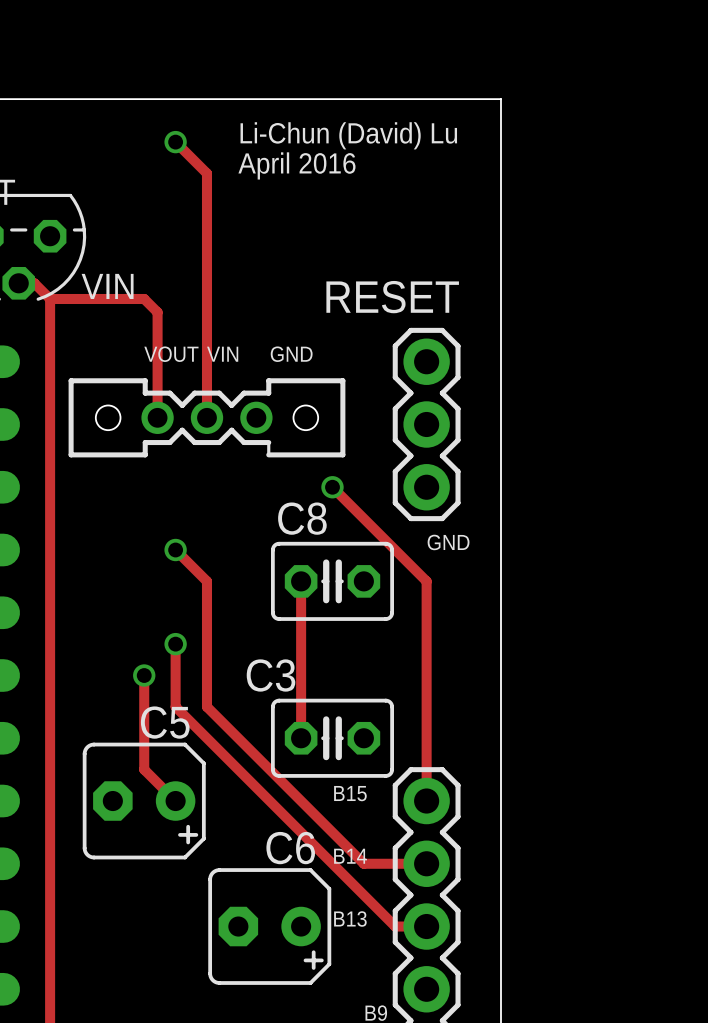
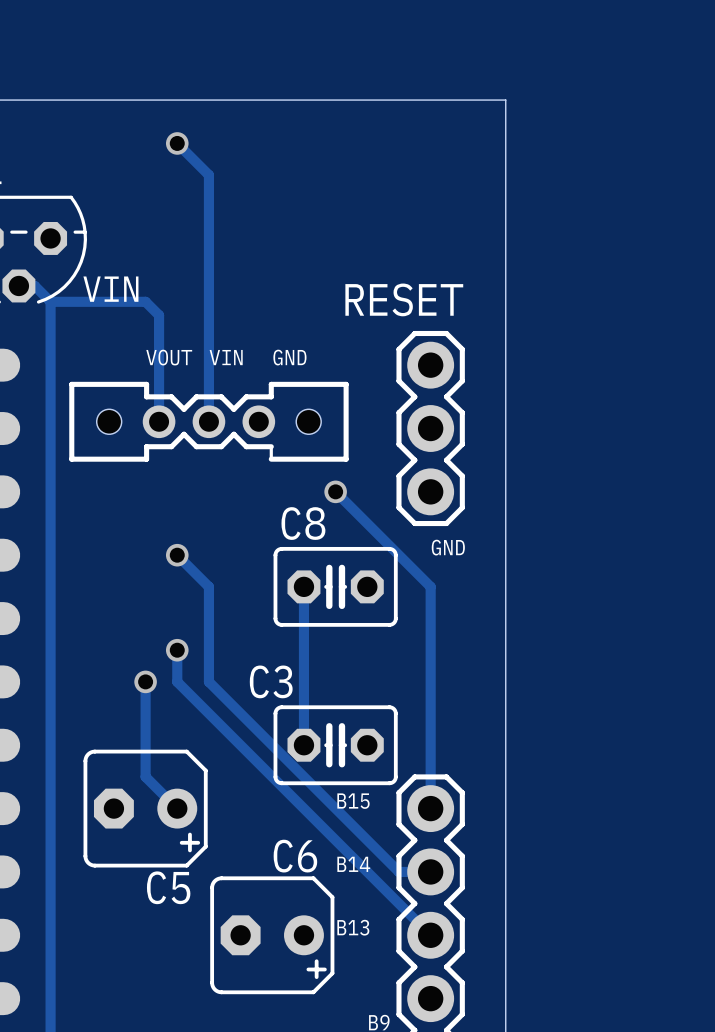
text: Li-Chun (David) Lu (348, 135) -> none
text: April 2016 (296, 165) -> none
track: (175, 675) (175, 706) (395, 926) (426, 926) -> none
track: (206, 675) (206, 706) -> (177, 681) (208, 713)
track: none -> (208, 681) (398, 871)
C5 name position: C5 (165, 722) -> C5 (168, 887)
track: (363, 863) (395, 863) -> (367, 871) (430, 935)

